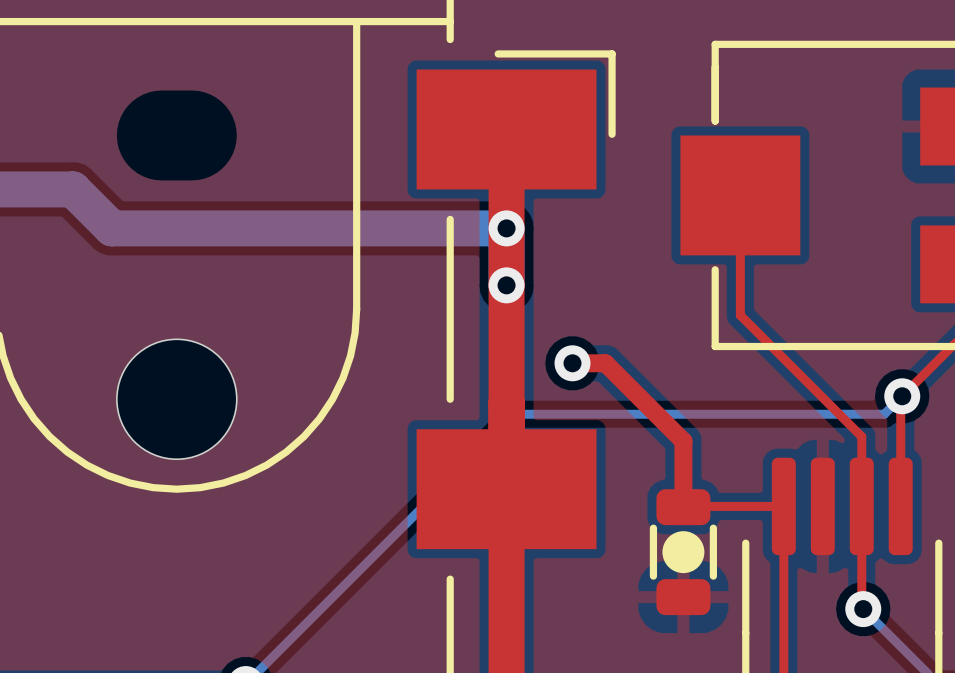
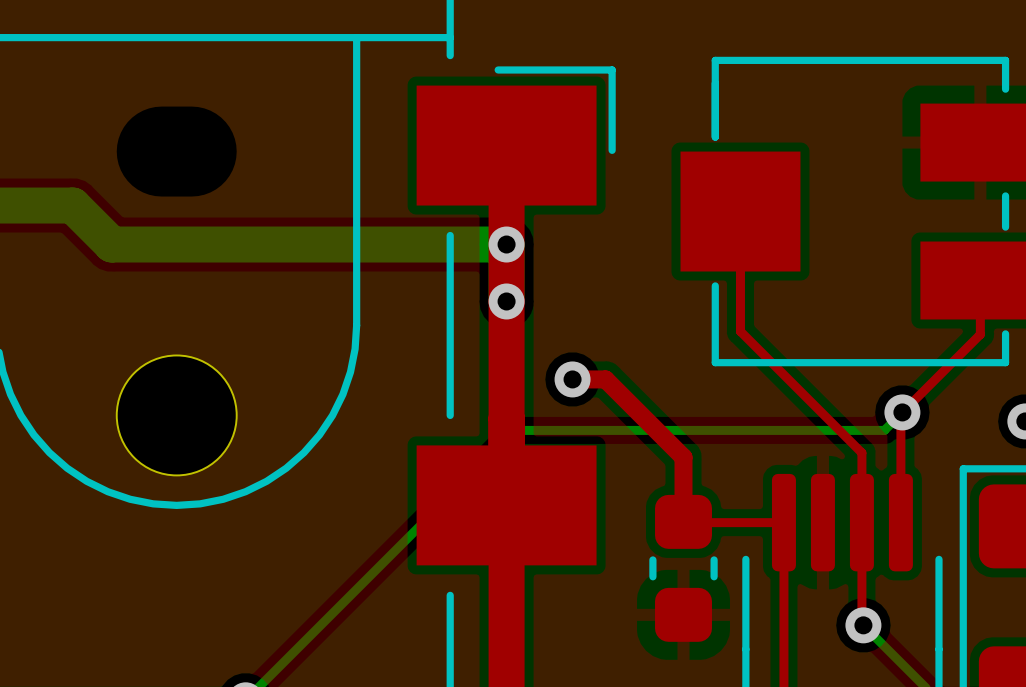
part footprint: [649, 489, 717, 616] -> [649, 494, 718, 642]

